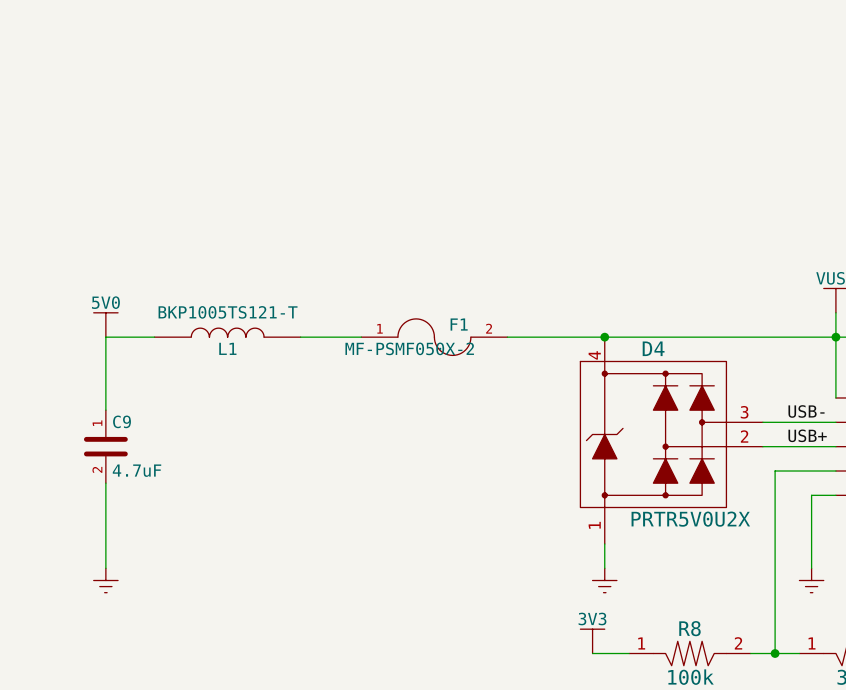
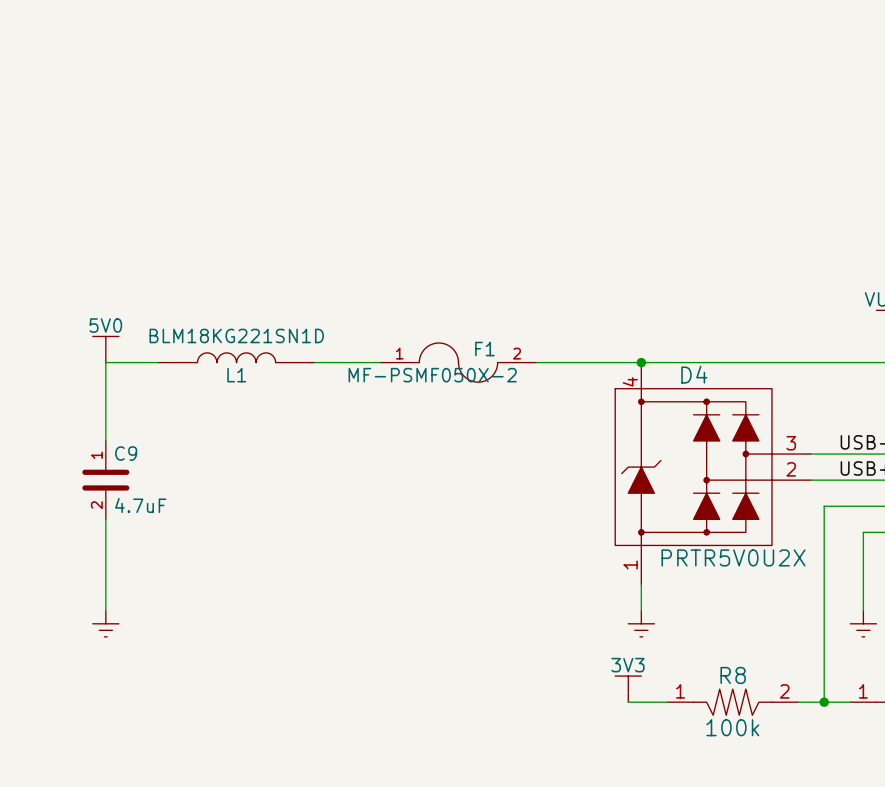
L1 value: BKP1005TS121-T (228, 312) -> BLM18KG221SN1D (236, 335)

